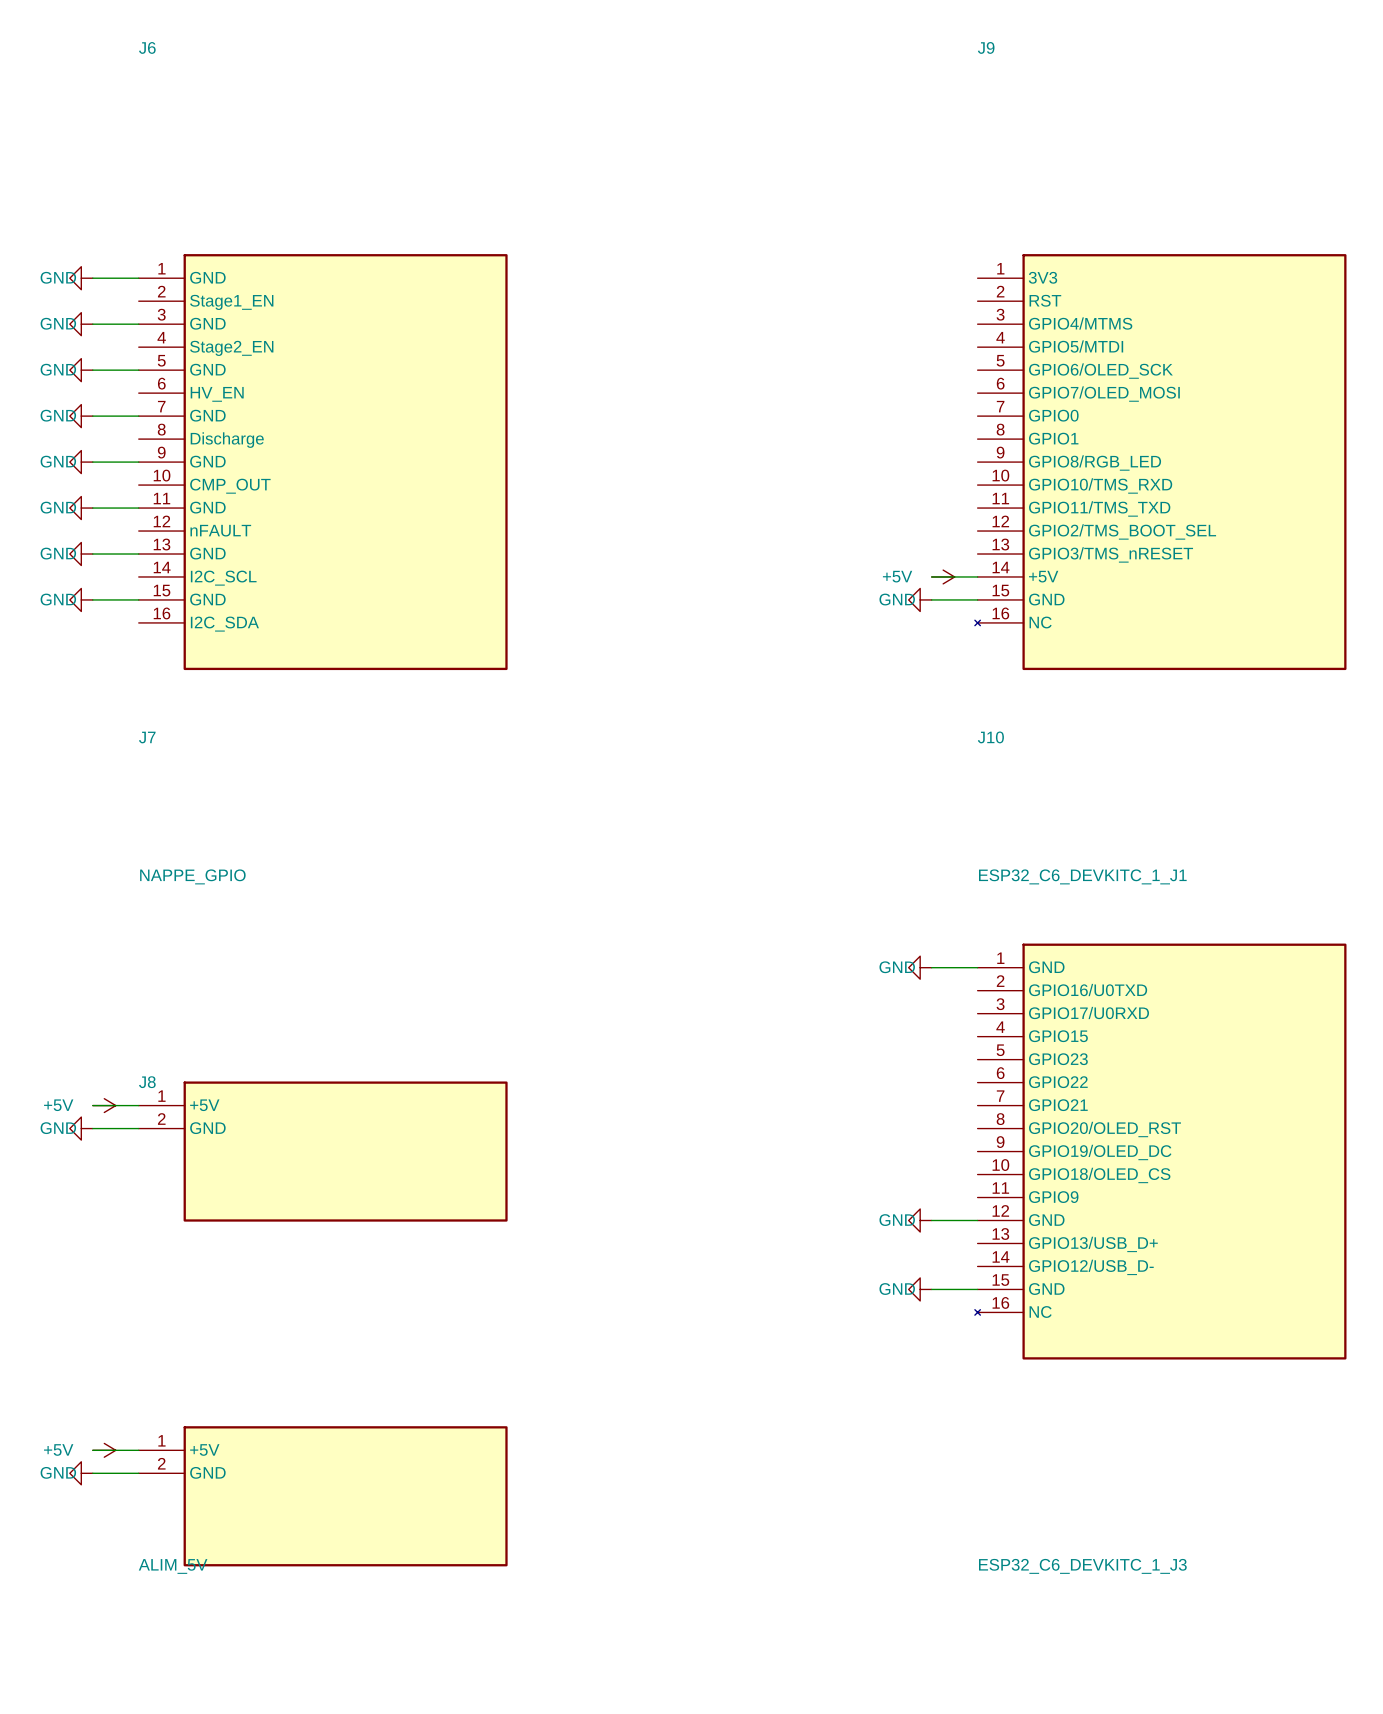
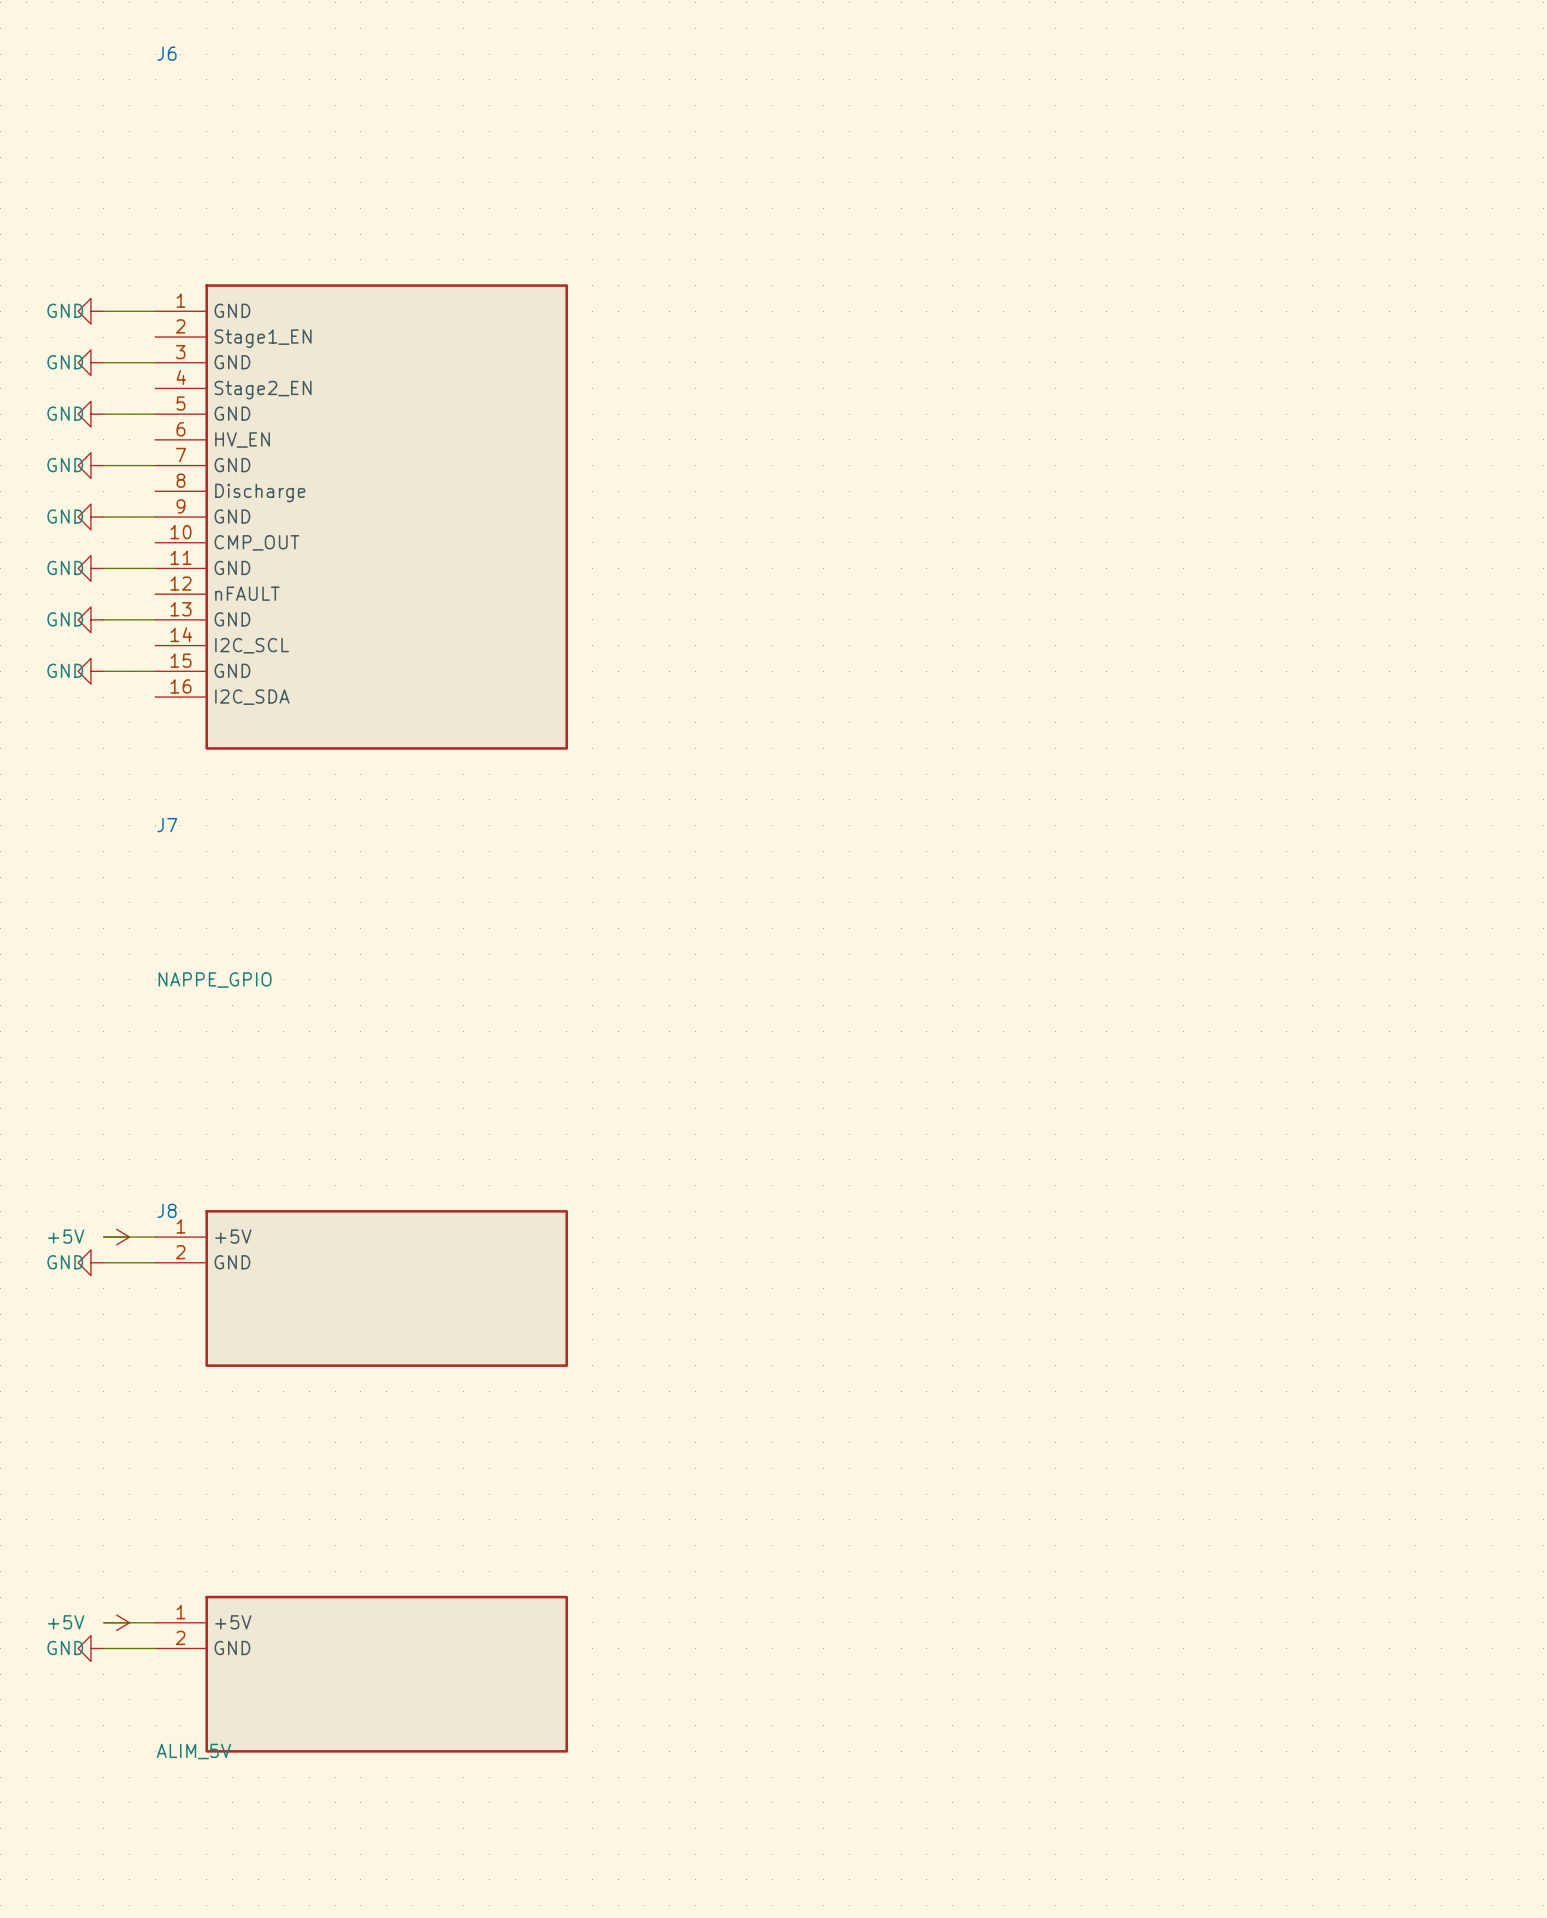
J9: ESP32_C6_DEVKITC_1_J1 (1160, 462) -> none
wire: (931, 576) (977, 576) -> none
power symbol: +5V (943, 576) -> none
power symbol: GND (920, 599) -> none
wire: (931, 599) (977, 599) -> none
power symbol: GND (920, 967) -> none
wire: (931, 967) (977, 967) -> none
J10: ESP32_C6_DEVKITC_1_J3 (1160, 1151) -> none
power symbol: GND (920, 1220) -> none
wire: (931, 1220) (977, 1220) -> none
power symbol: GND (920, 1289) -> none
wire: (931, 1289) (977, 1289) -> none

